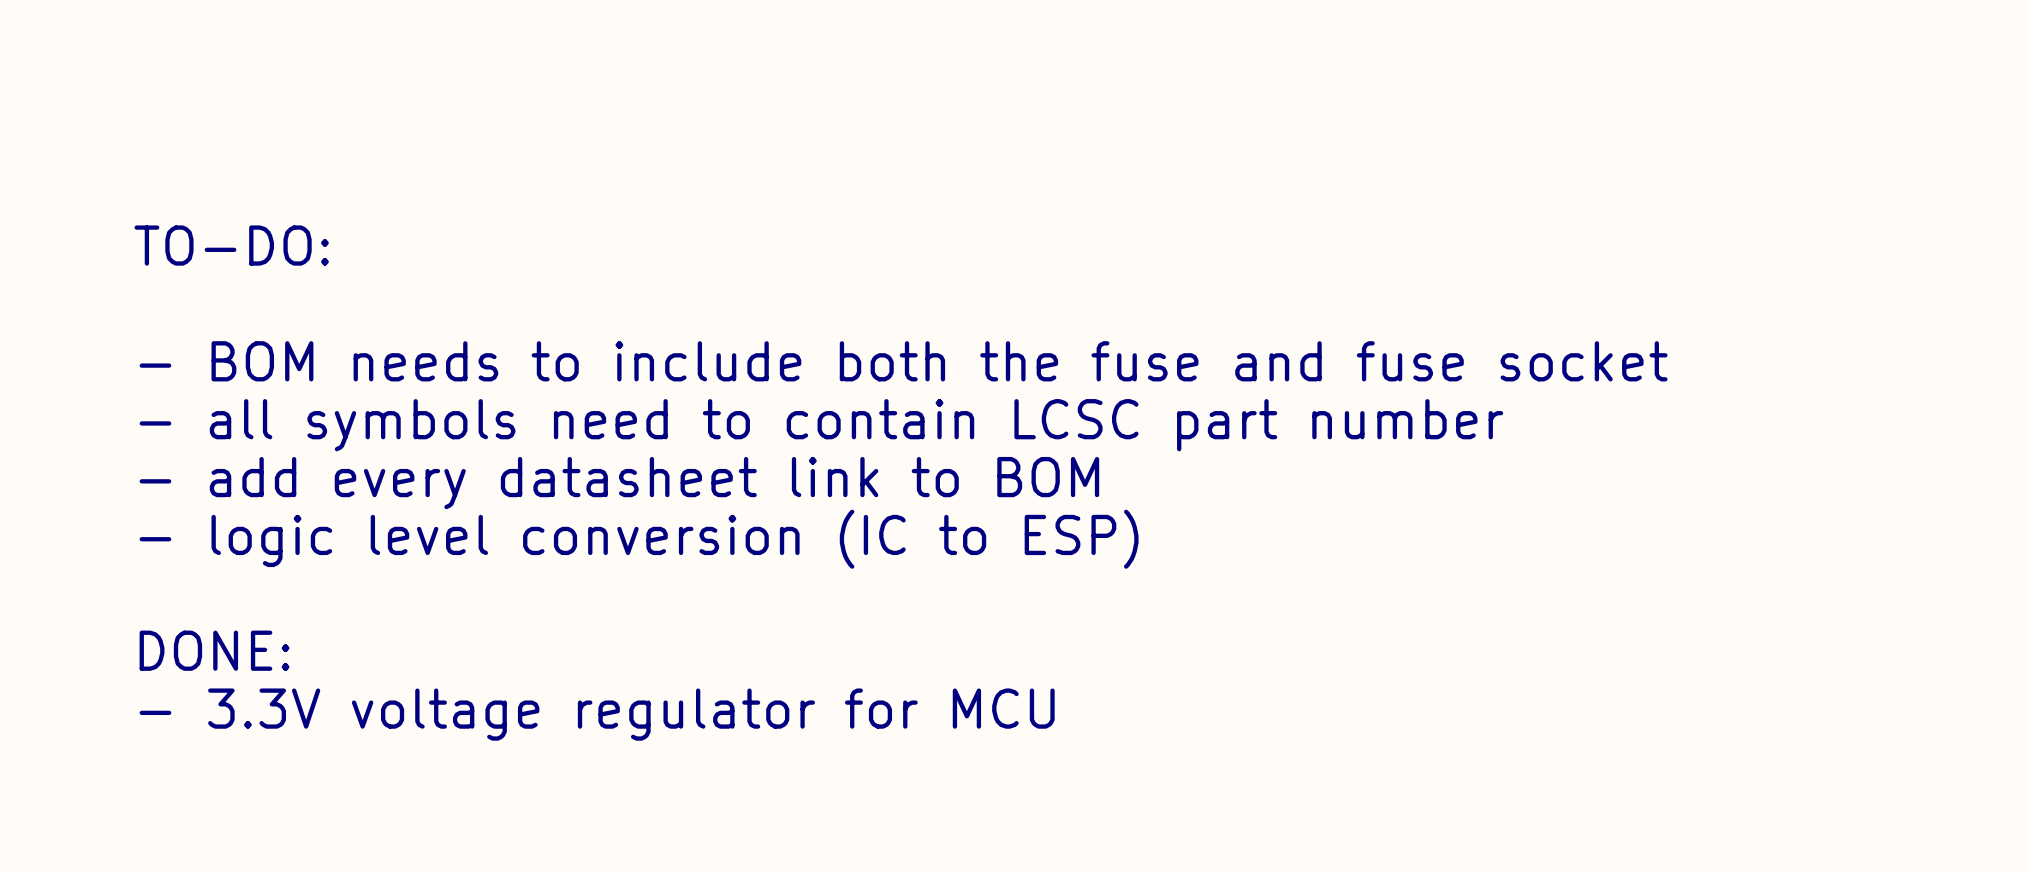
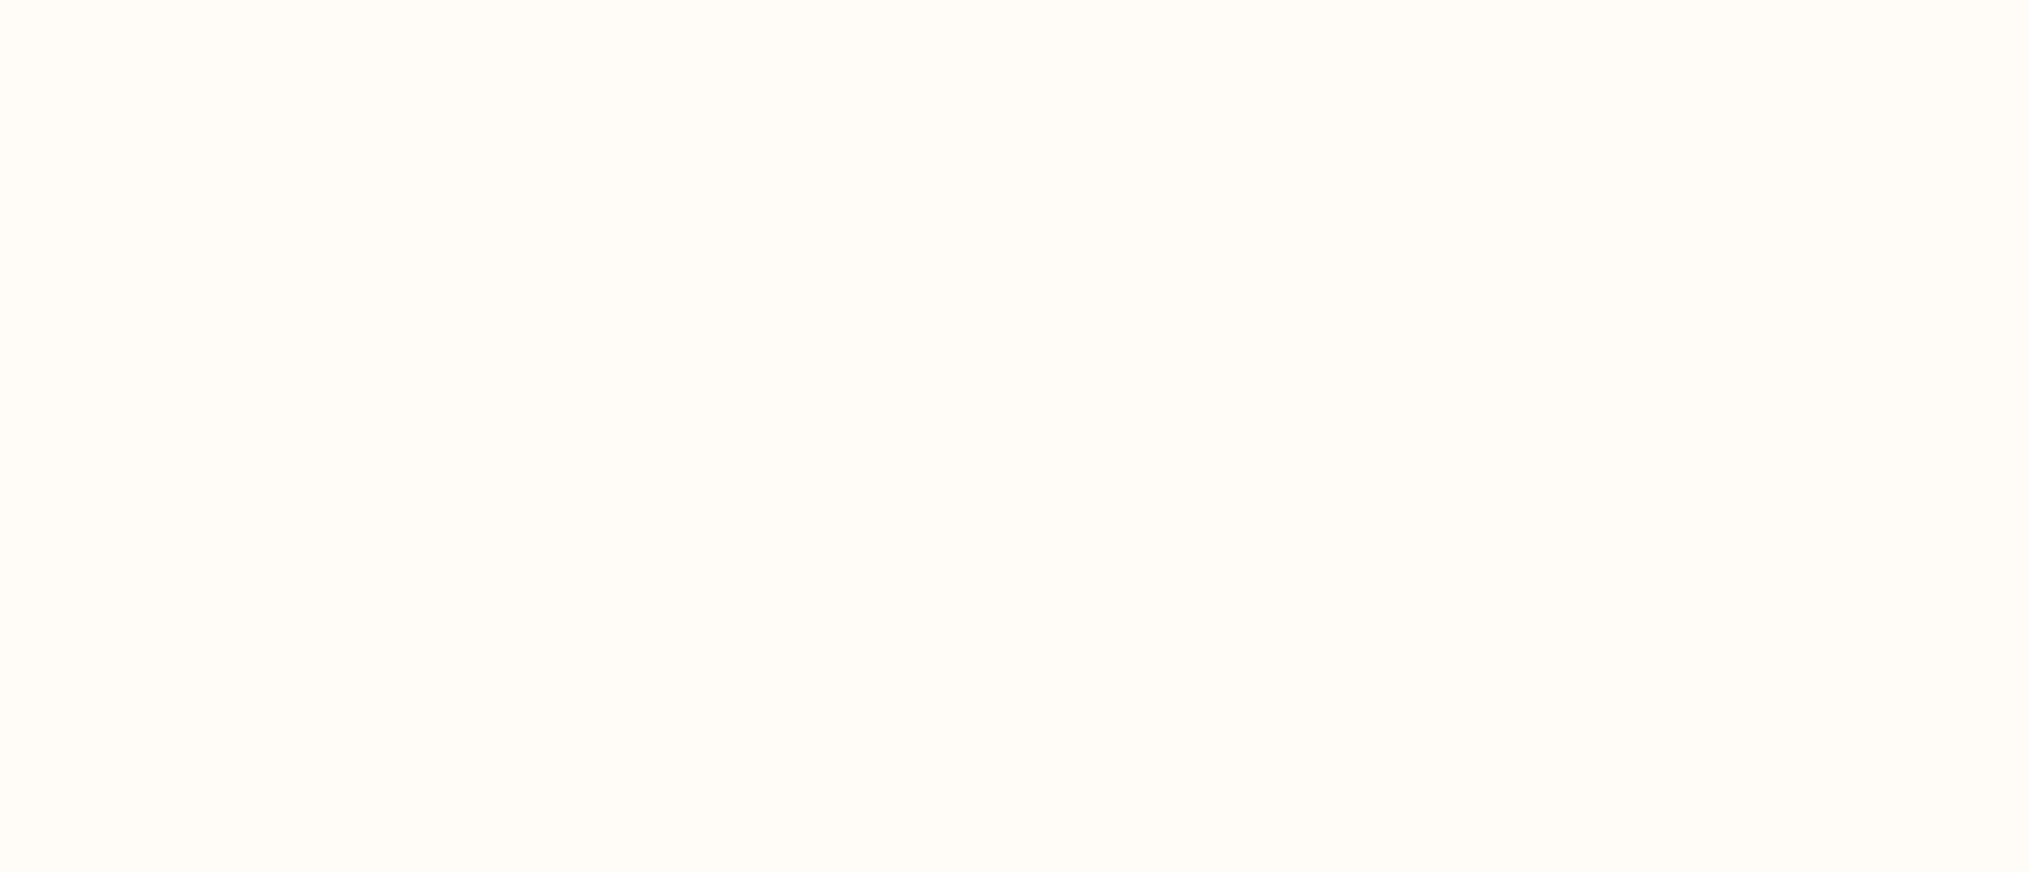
text: TO-DO: (231, 245) -> none
text: - BOM needs to include both the fuse and fuse socket (903, 361) -> none
text: - all symbols need to contain LCSC part number (821, 425) -> none
text: - add every datasheet link to BOM (619, 483) -> none
text: - logic level conversion (IC to ESP) (639, 539) -> none
text: DONE: (214, 650) -> none
text: - 3.3V voltage regulator for MCU (597, 714) -> none

